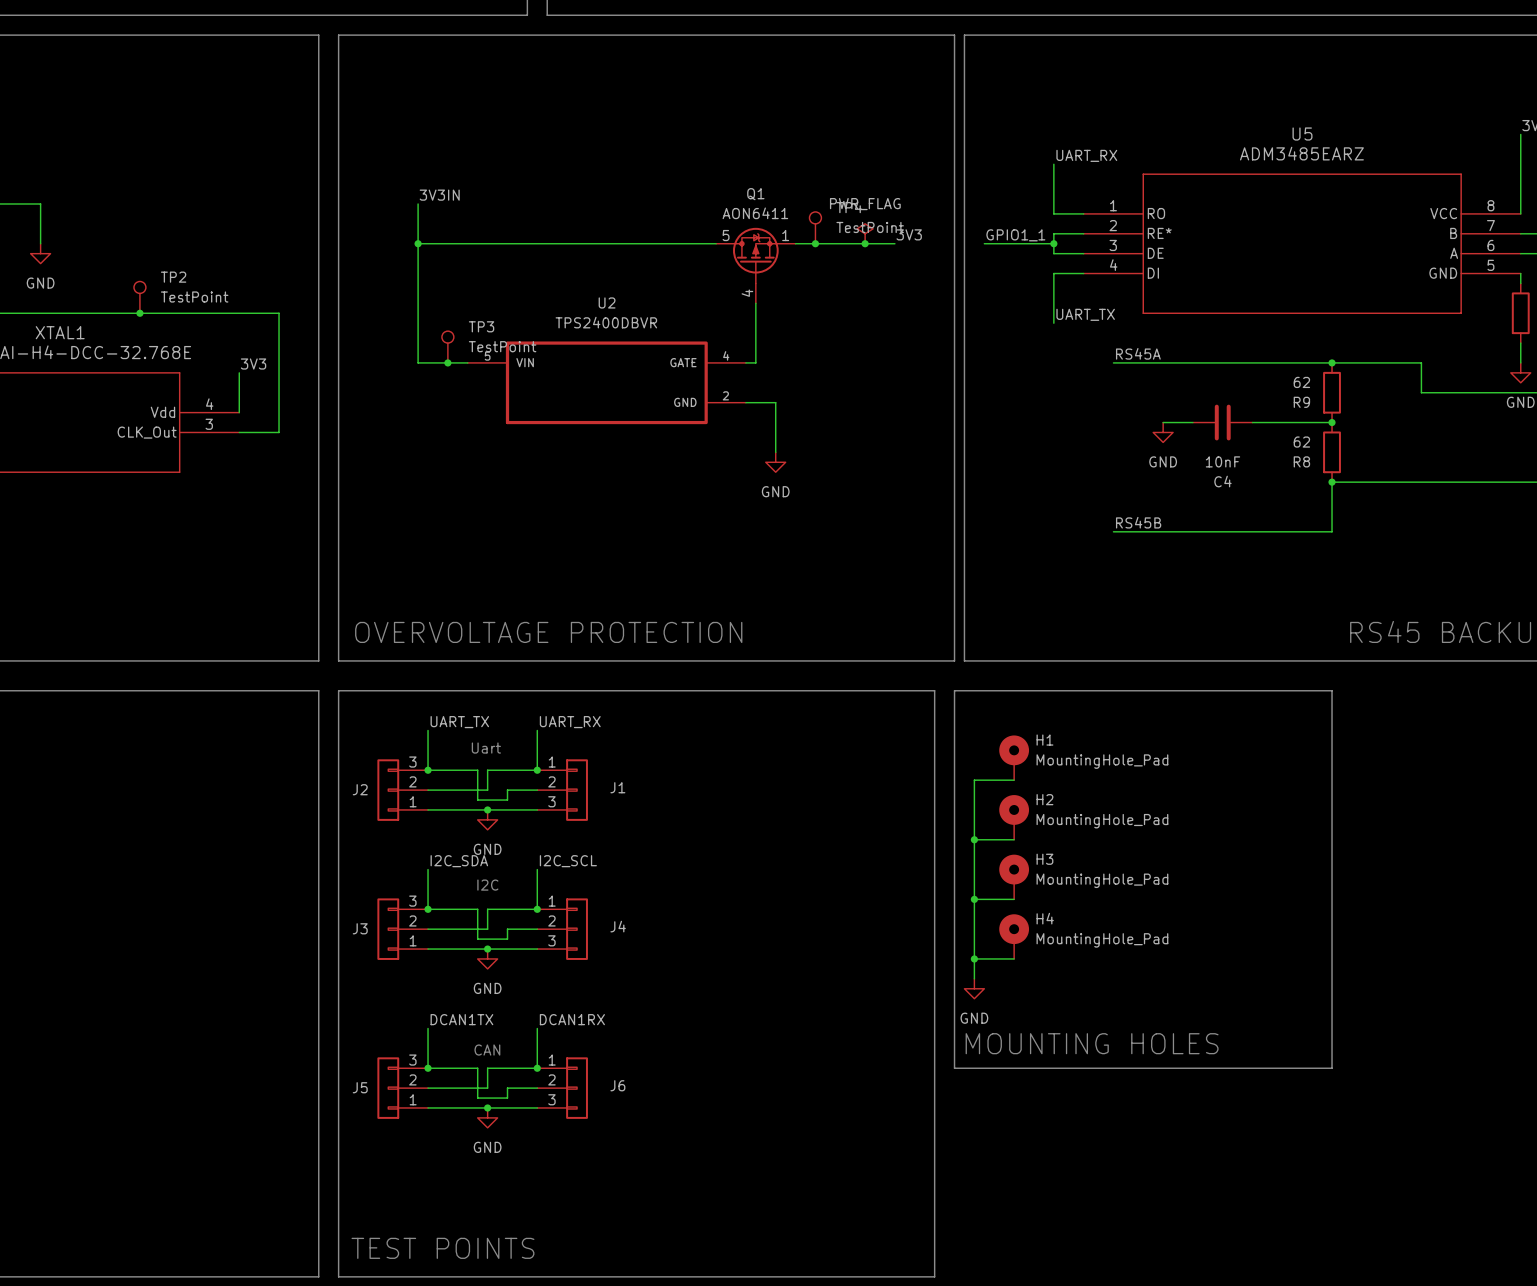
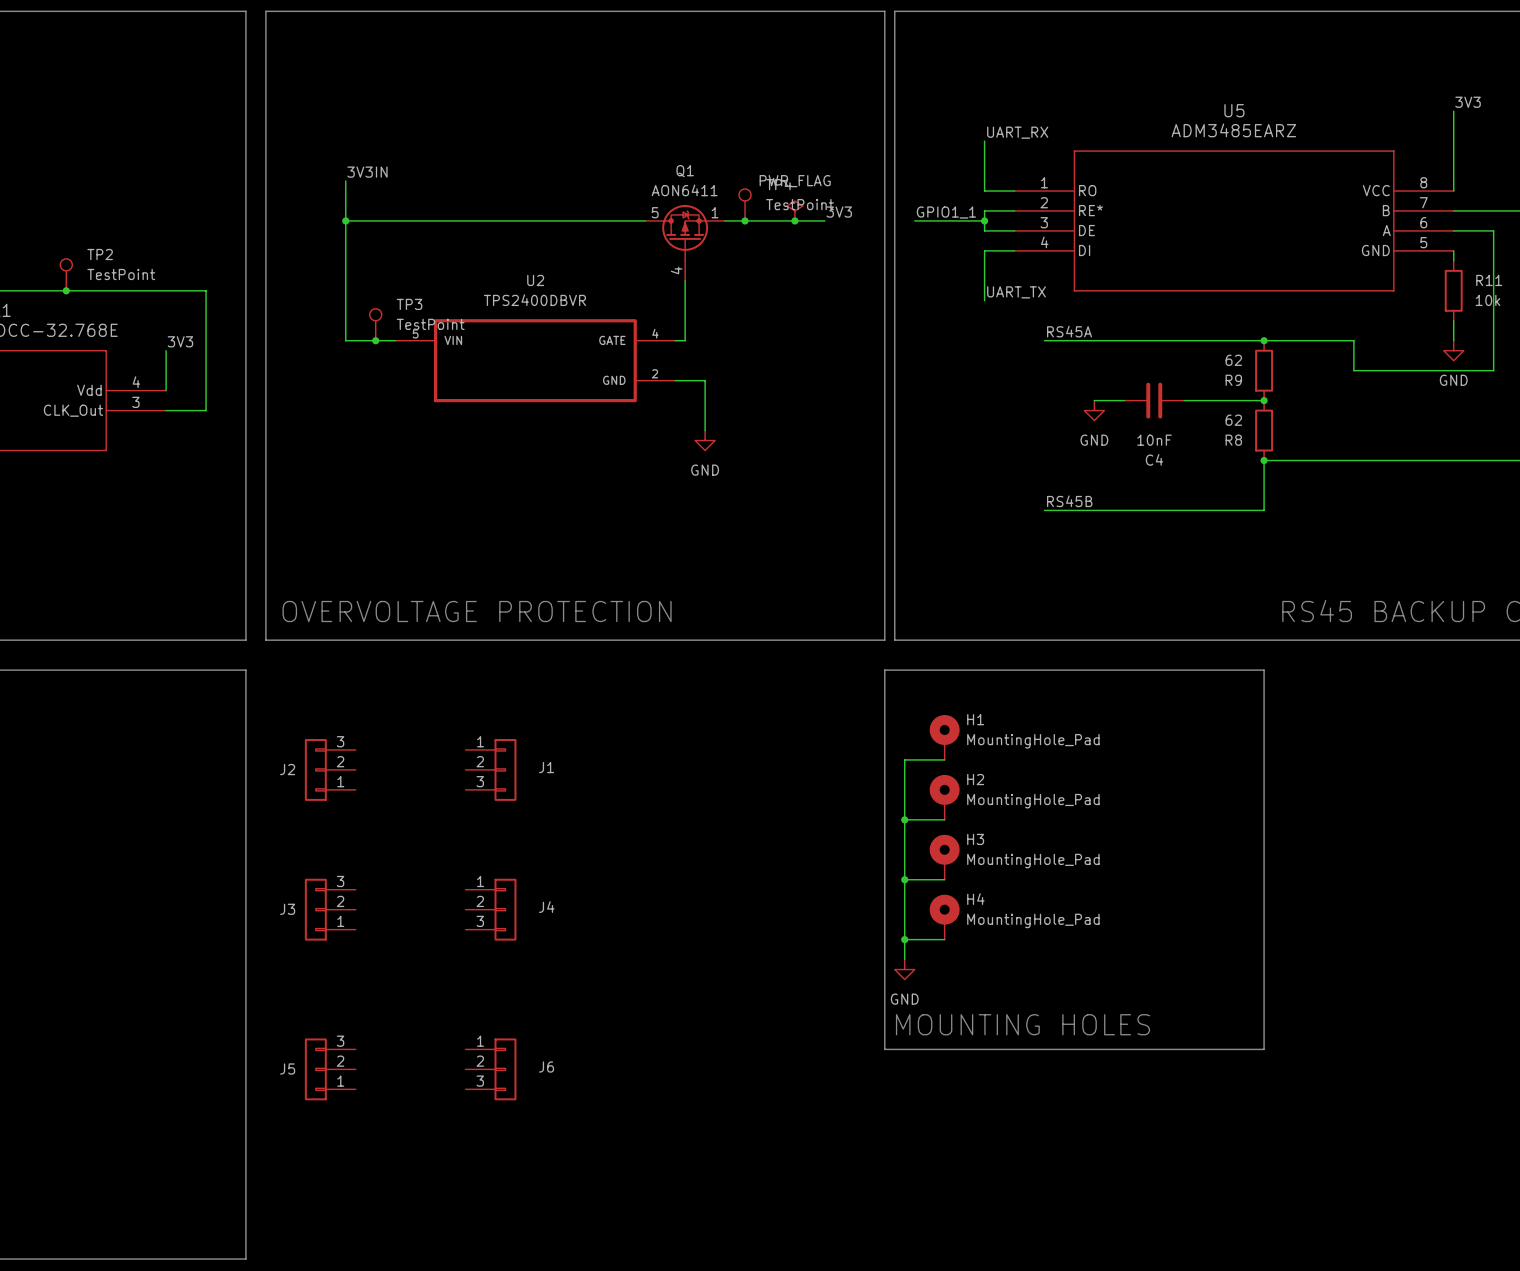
line: (338, 690) (934, 690) (934, 1276) (338, 1276) (338, 690) -> none
label: UART_TX (459, 722) -> none
label: UART_RX (570, 722) -> none
wire: (428, 730) (428, 770) (477, 770) (477, 800) (507, 800) (507, 790) (537, 790) -> none
wire: (537, 730) (537, 770) (487, 770) (487, 790) (428, 790) -> none
text: Uart (486, 748) -> none
junction: (428, 770) -> none
junction: (537, 770) -> none
wire: (428, 809) (537, 809) -> none
junction: (487, 809) -> none
power symbol: GND (487, 819) -> none
label: I2C_SDA (459, 861) -> none
label: I2C_SCL (568, 861) -> none
wire: (428, 869) (428, 909) (477, 909) (477, 939) (507, 939) (507, 929) (537, 929) -> none
wire: (537, 869) (537, 909) (487, 909) (487, 929) (428, 929) -> none
text: I2C (487, 885) -> none
junction: (428, 909) -> none
junction: (537, 909) -> none
wire: (428, 949) (537, 949) -> none
junction: (487, 949) -> none
power symbol: GND (487, 958) -> none
label: DCAN1TX (461, 1019) -> none
label: DCAN1RX (572, 1019) -> none
wire: (428, 1028) (428, 1068) (477, 1068) (477, 1098) (507, 1098) (507, 1088) (537, 1088) -> none
wire: (537, 1028) (537, 1068) (487, 1068) (487, 1088) (428, 1088) -> none
text: CAN (487, 1050) -> none
junction: (428, 1068) -> none
junction: (537, 1068) -> none
wire: (428, 1107) (537, 1107) -> none
junction: (487, 1107) -> none
power symbol: GND (487, 1117) -> none
text: TEST POINTS (442, 1248) -> none

